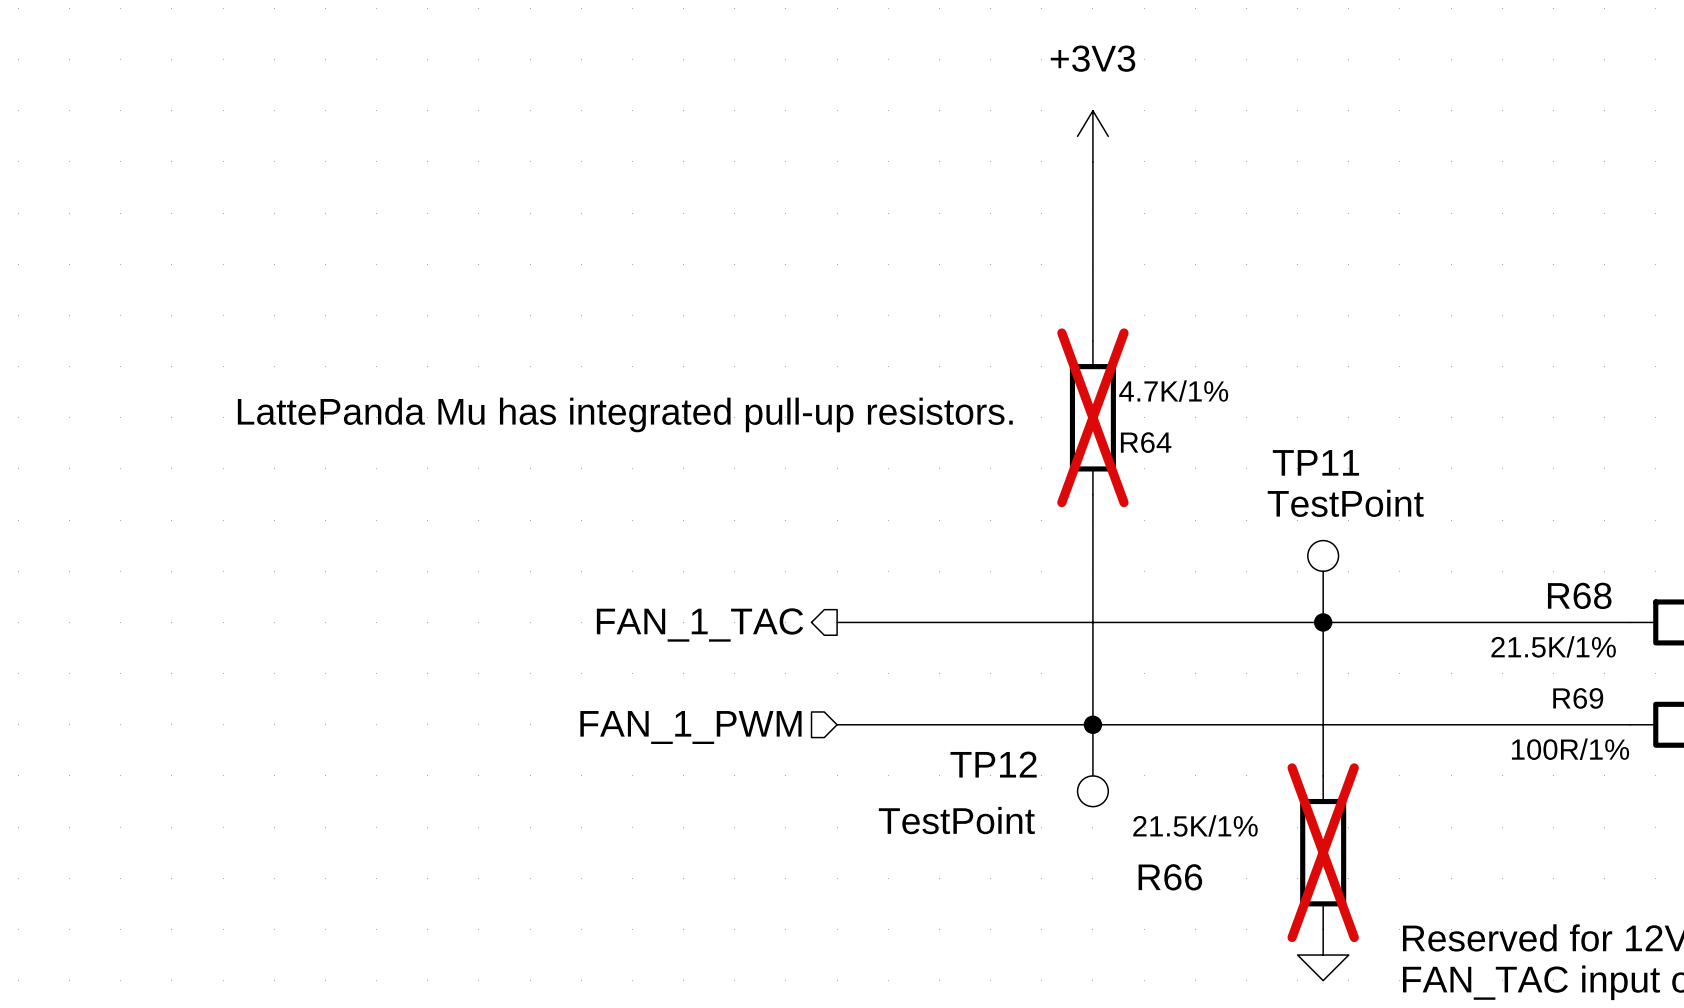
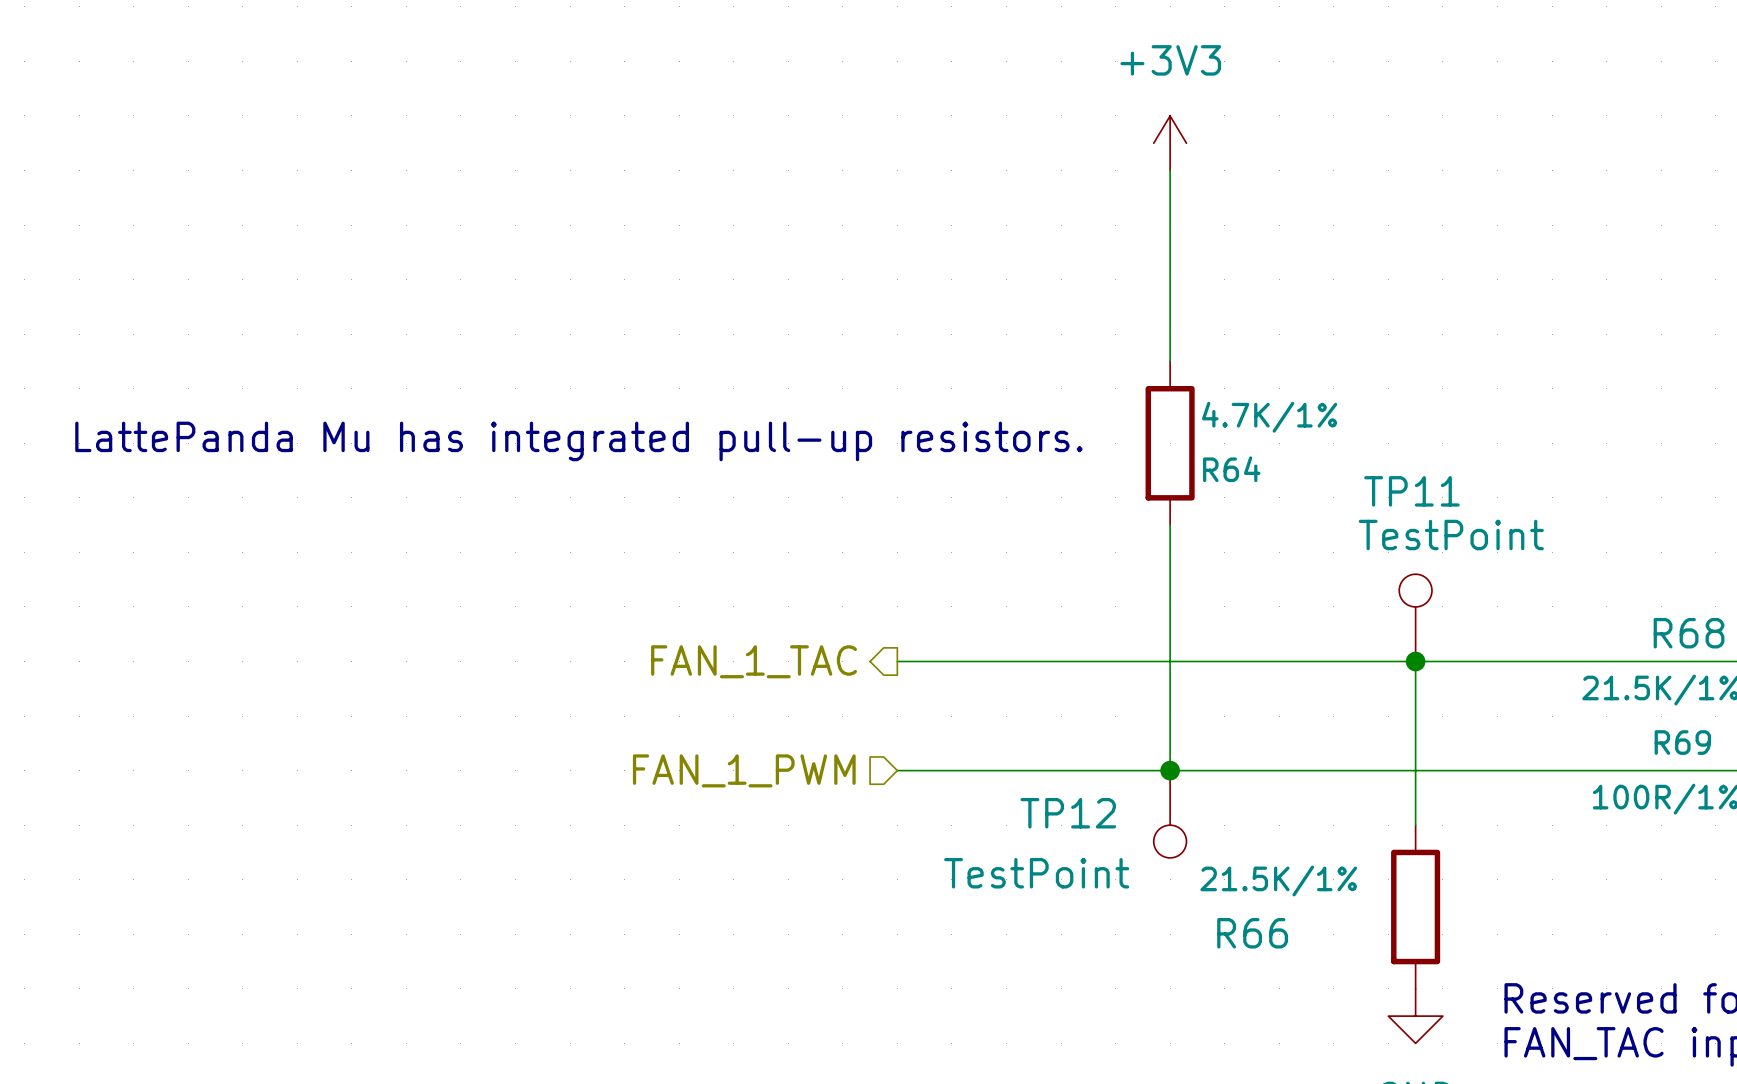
R64 do-not-place cross: (1092, 417) -> none
R66 do-not-place cross: (1323, 852) -> none

